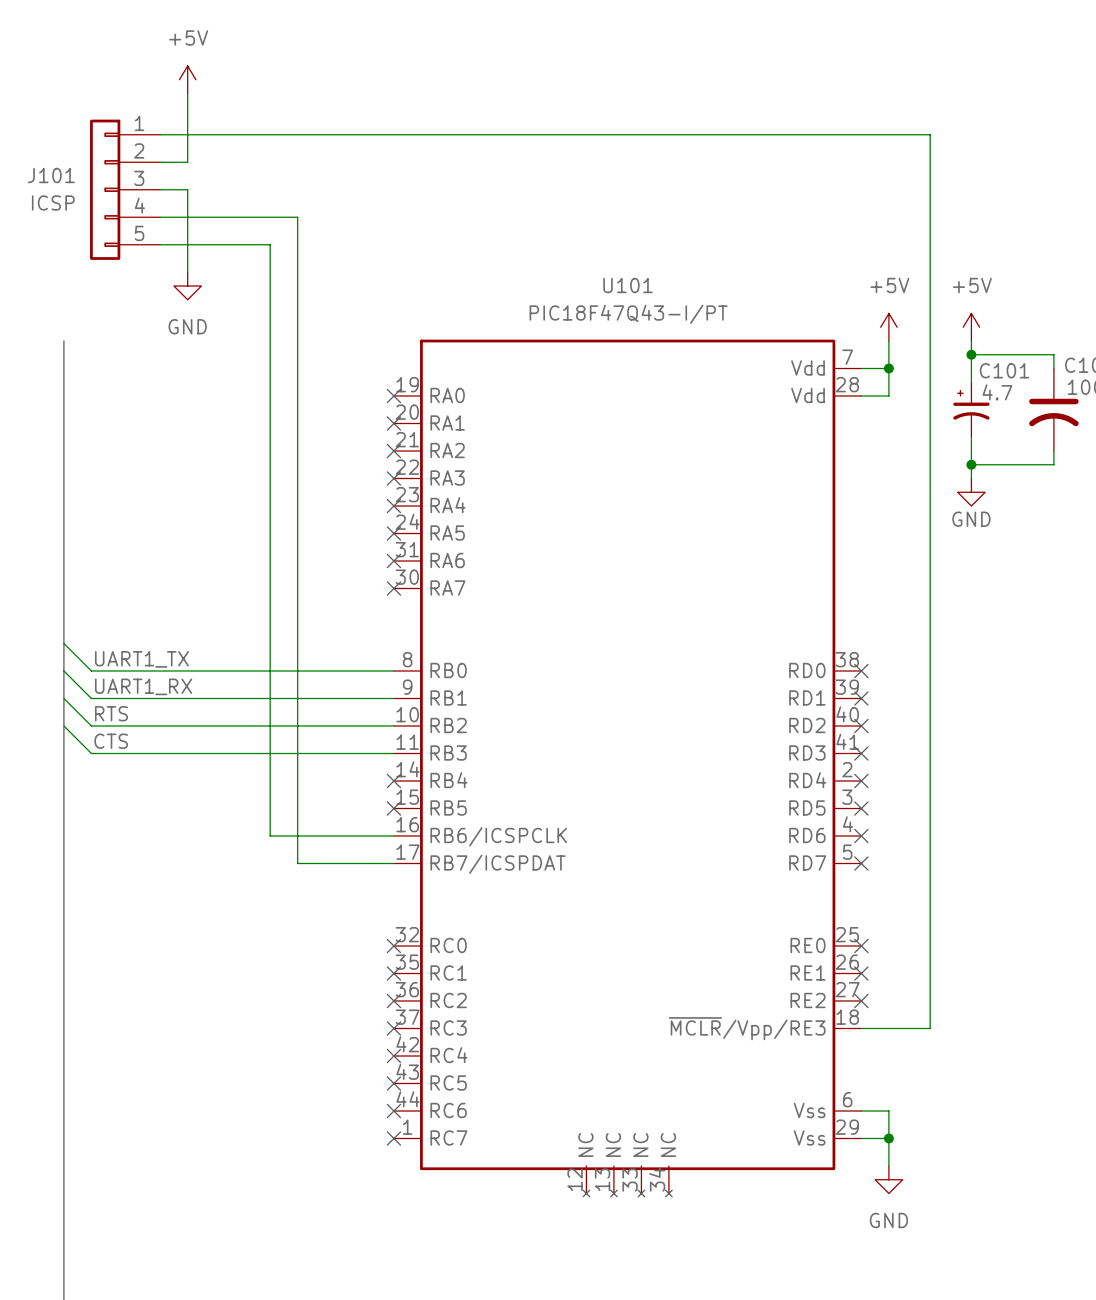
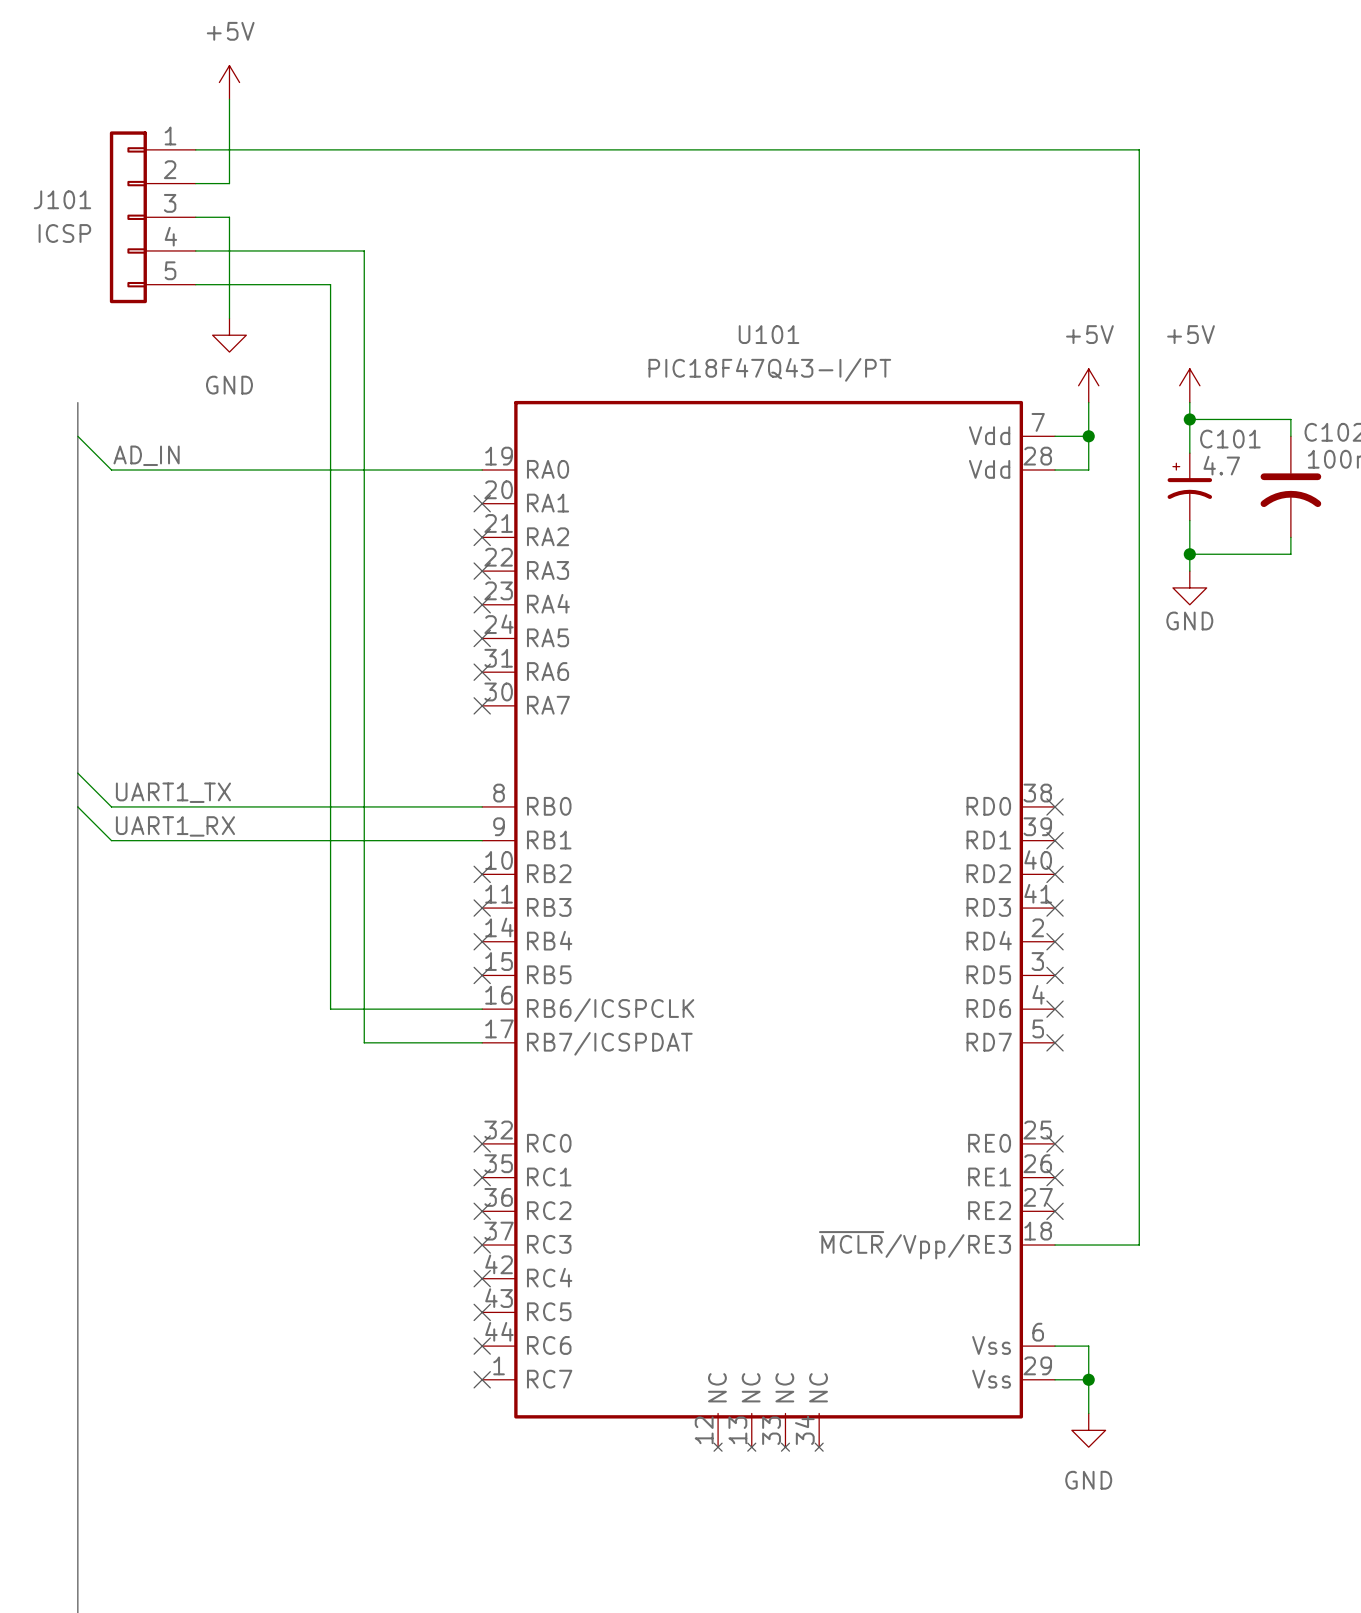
wire: none -> (77, 436) (111, 470) (482, 470)
label: none -> AD_IN (146, 455)
no-connect mark: (393, 396) -> none
wire: (63, 698) (91, 726) (393, 726) -> none
label: RTS (111, 713) -> none
wire: (63, 726) (91, 753) (393, 753) -> none
no-connect mark: none -> (482, 874)
label: CTS (111, 741) -> none
no-connect mark: none -> (482, 908)

